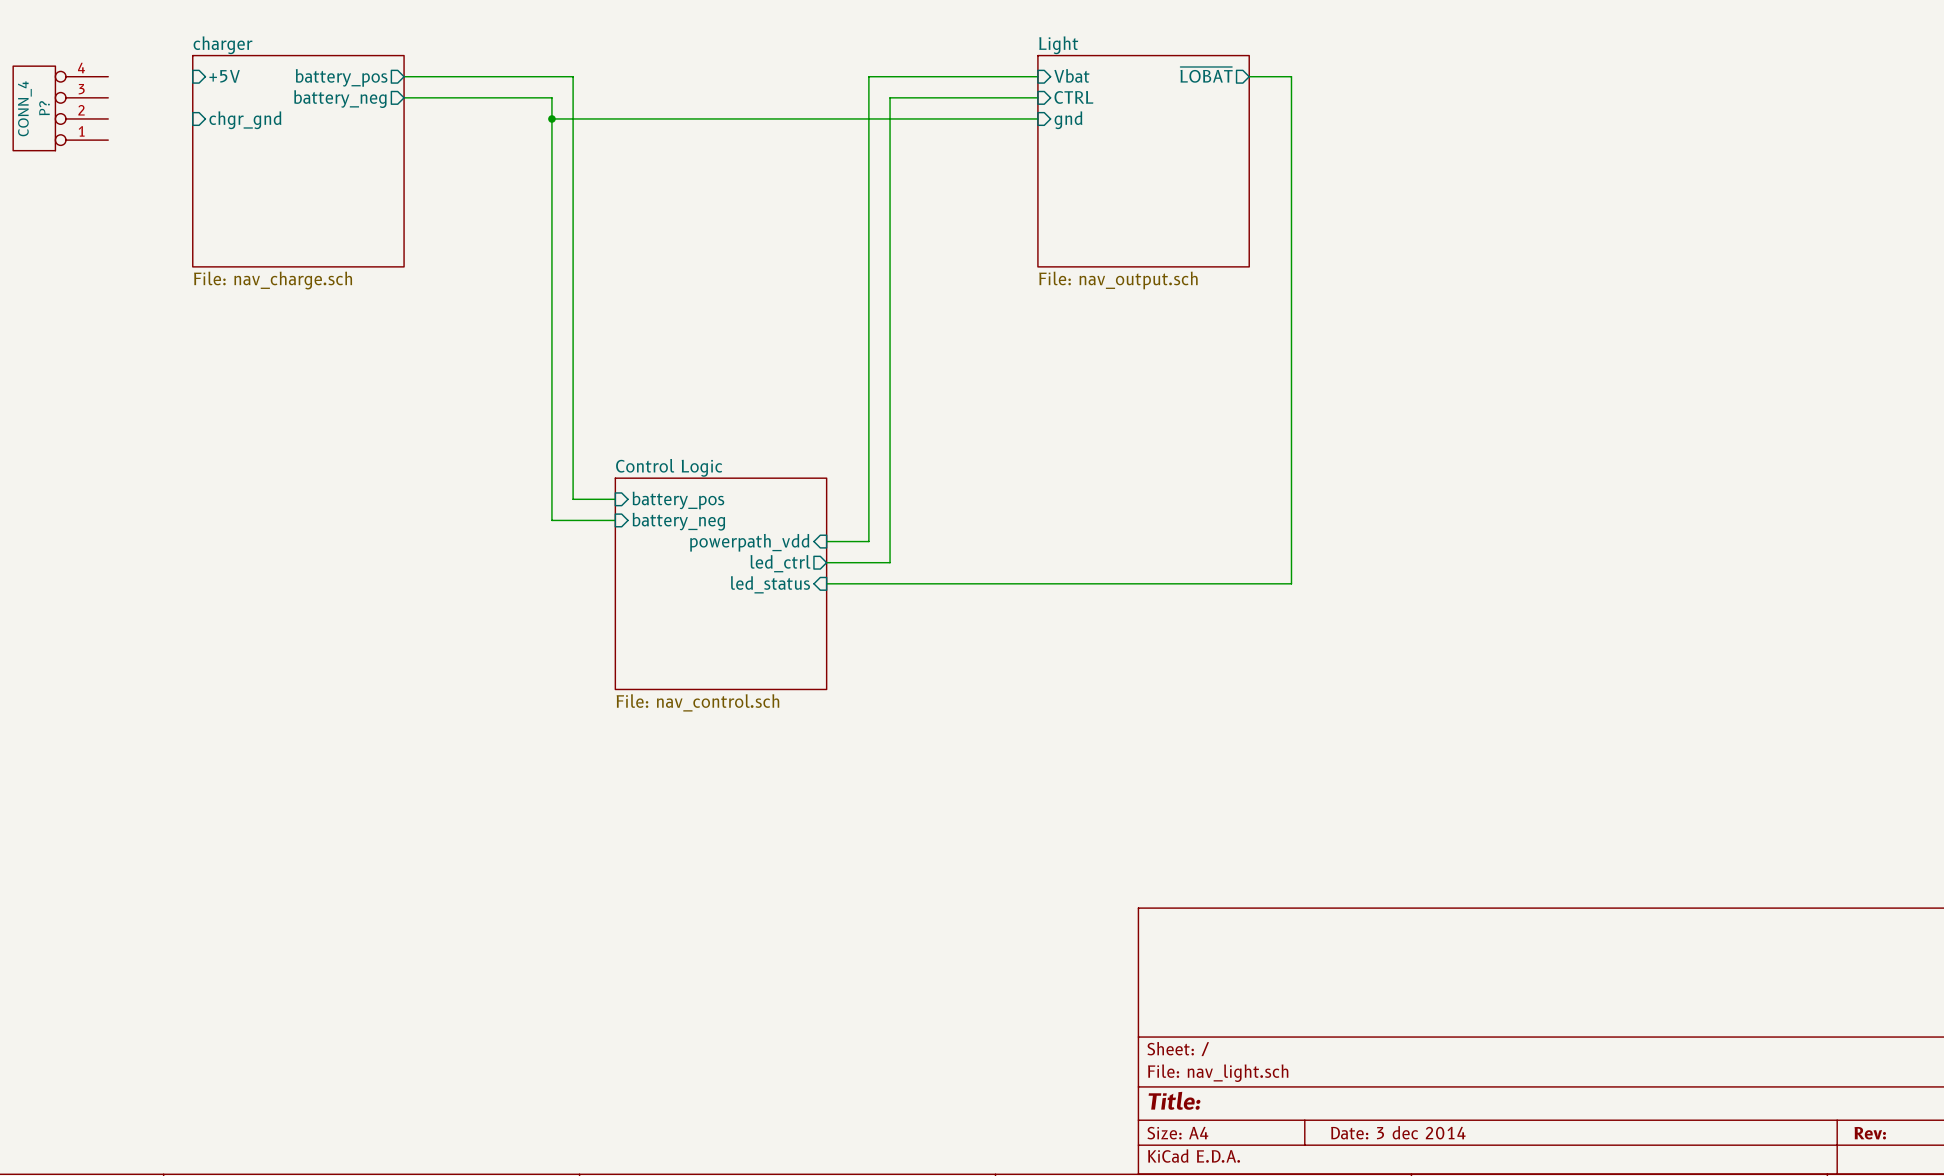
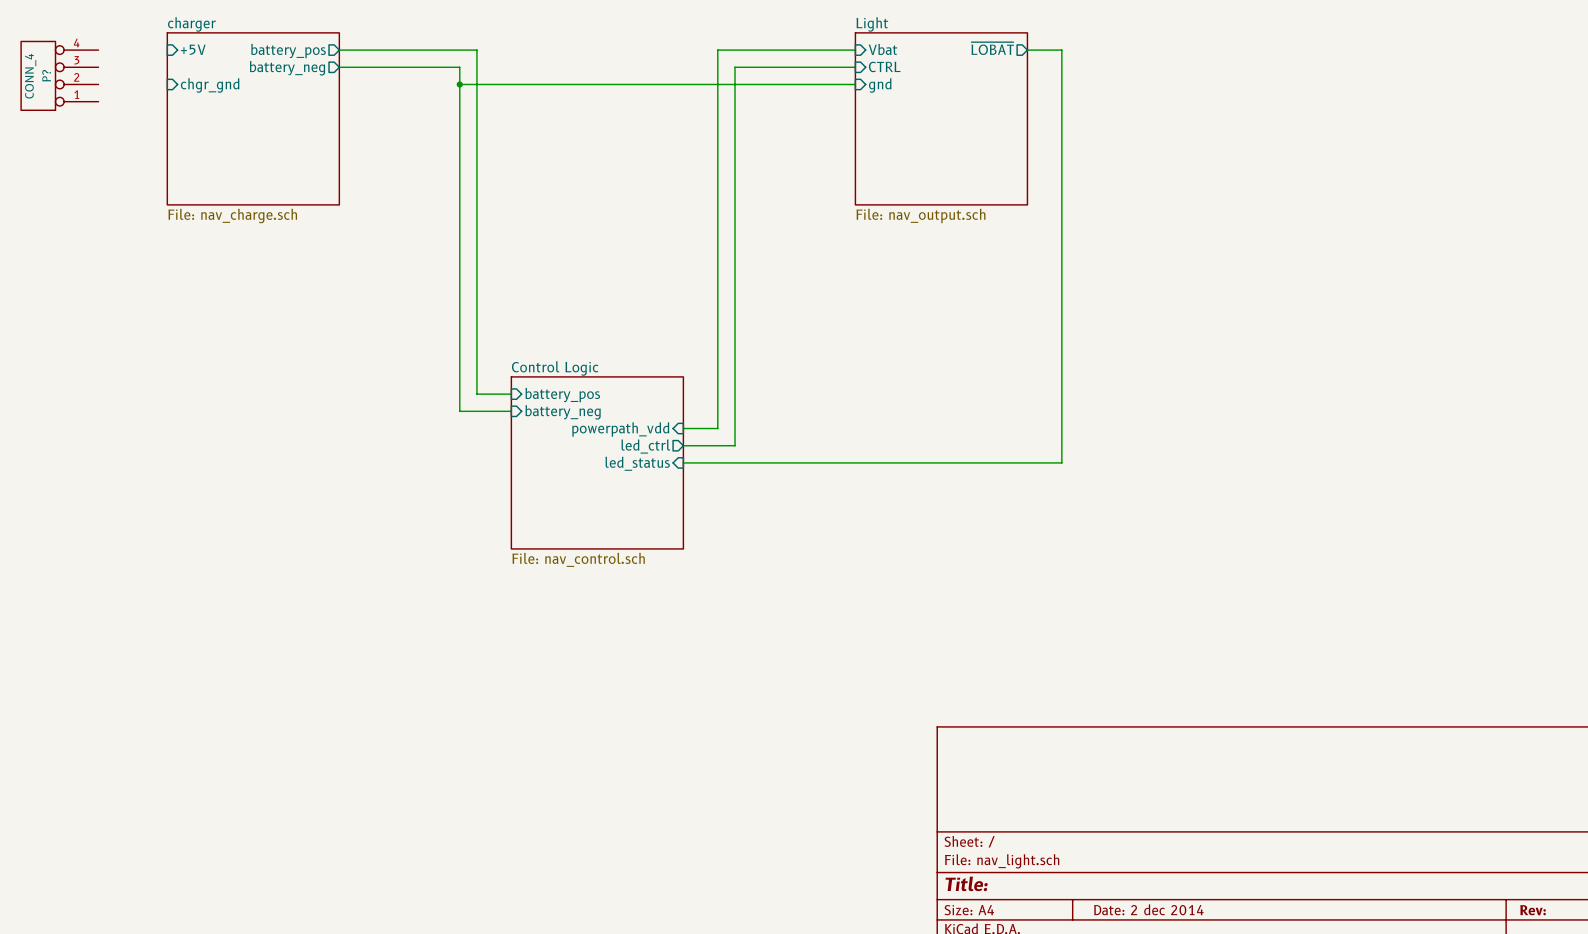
title block: Date: 3 dec 2014 (1398, 1132) -> Date: 2 dec 2014 (1148, 909)

